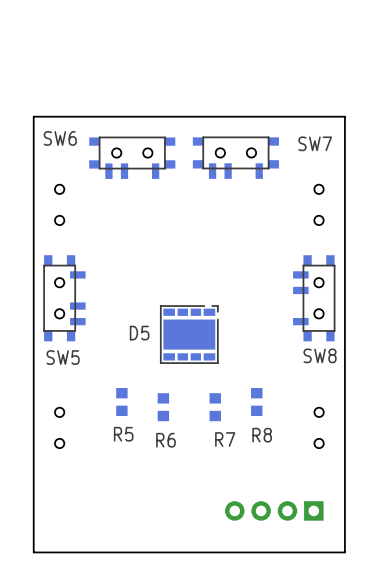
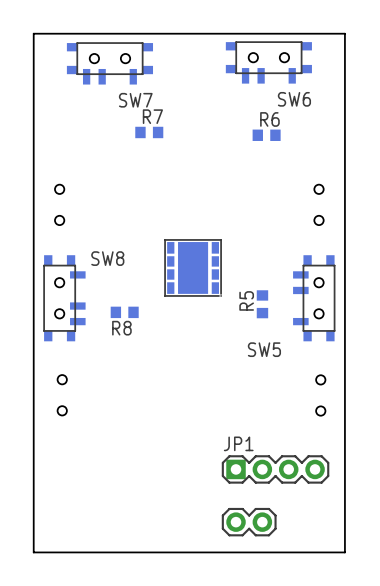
board edge: (344, 116) (33, 116) -> (344, 116) (344, 33) (33, 33) (33, 116)
SW6 name position: SW6 (60, 138) -> SW6 (294, 99)
SW7 name position: SW7 (315, 143) -> SW7 (135, 100)
SW6 position: (132, 157) -> (268, 62)
SW7 position: (235, 157) -> (109, 63)
part: none -> (193, 267)
D5: (189, 334) -> none
SW8 name: SW8 (320, 355) -> SW5 (264, 349)
SW5 name: SW5 (63, 357) -> SW8 (107, 258)
R5 position: (121, 402) -> (262, 304)
R8 rotation: 0° (256, 402) -> 90° clockwise (124, 312)
R8 position: (256, 402) -> (124, 312)
R6 rotation: 0° (163, 407) -> 90° clockwise (266, 135)
R6 position: (163, 407) -> (266, 135)
R7 rotation: 0° (215, 407) -> 90° clockwise (149, 132)
R7 position: (215, 407) -> (149, 132)
part position: (59, 427) -> (62, 395)
part position: (319, 427) -> (320, 395)
R5 name rotation: 0° (123, 434) -> 90° counterclockwise (246, 300)
R5 name position: R5 (123, 434) -> R5 (246, 300)
R8 name position: R8 (262, 435) -> R8 (121, 328)
R7 name position: R7 (225, 439) -> R7 (152, 116)
R6 name position: R6 (166, 440) -> R6 (269, 119)
JP1 side: top (274, 510) -> bottom (275, 469)
part: none -> (249, 522)

